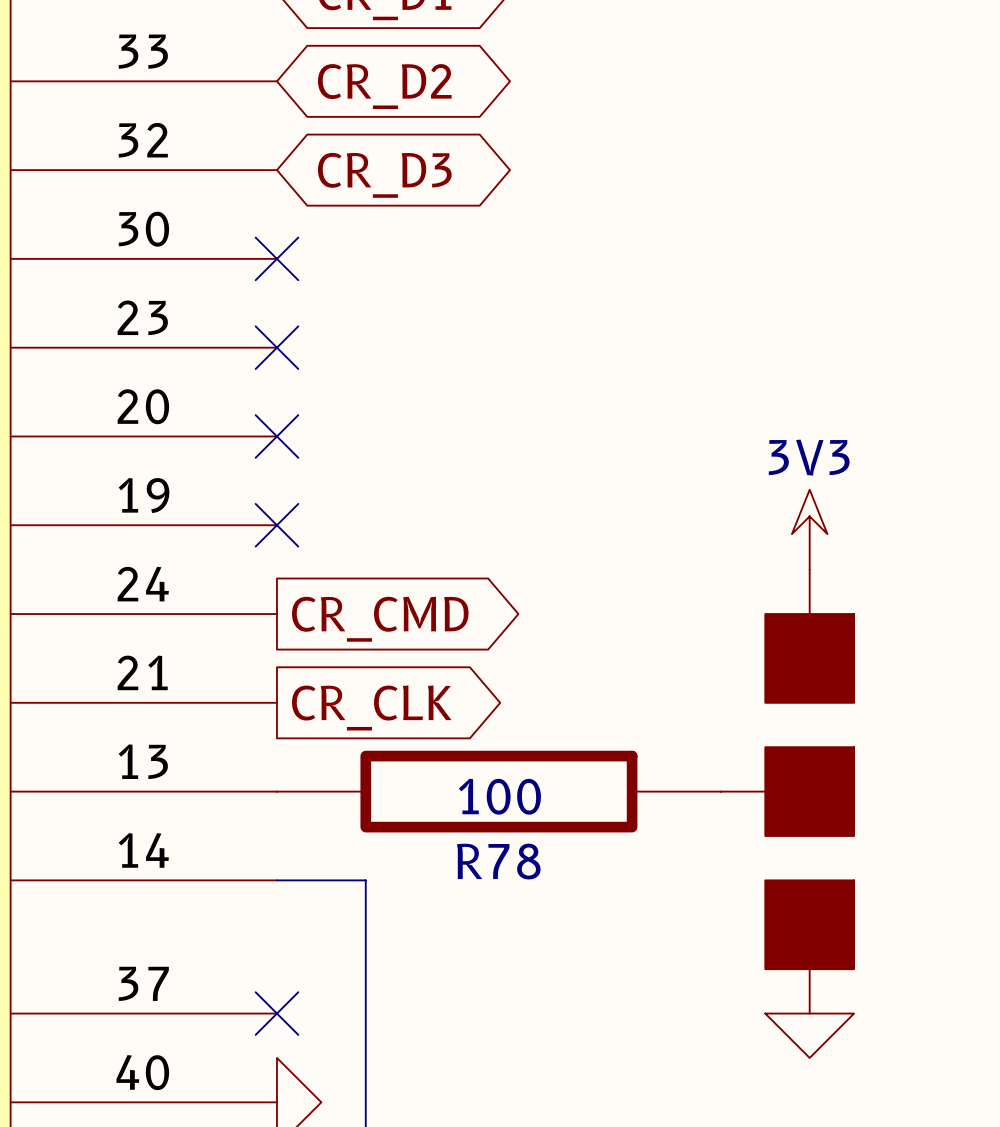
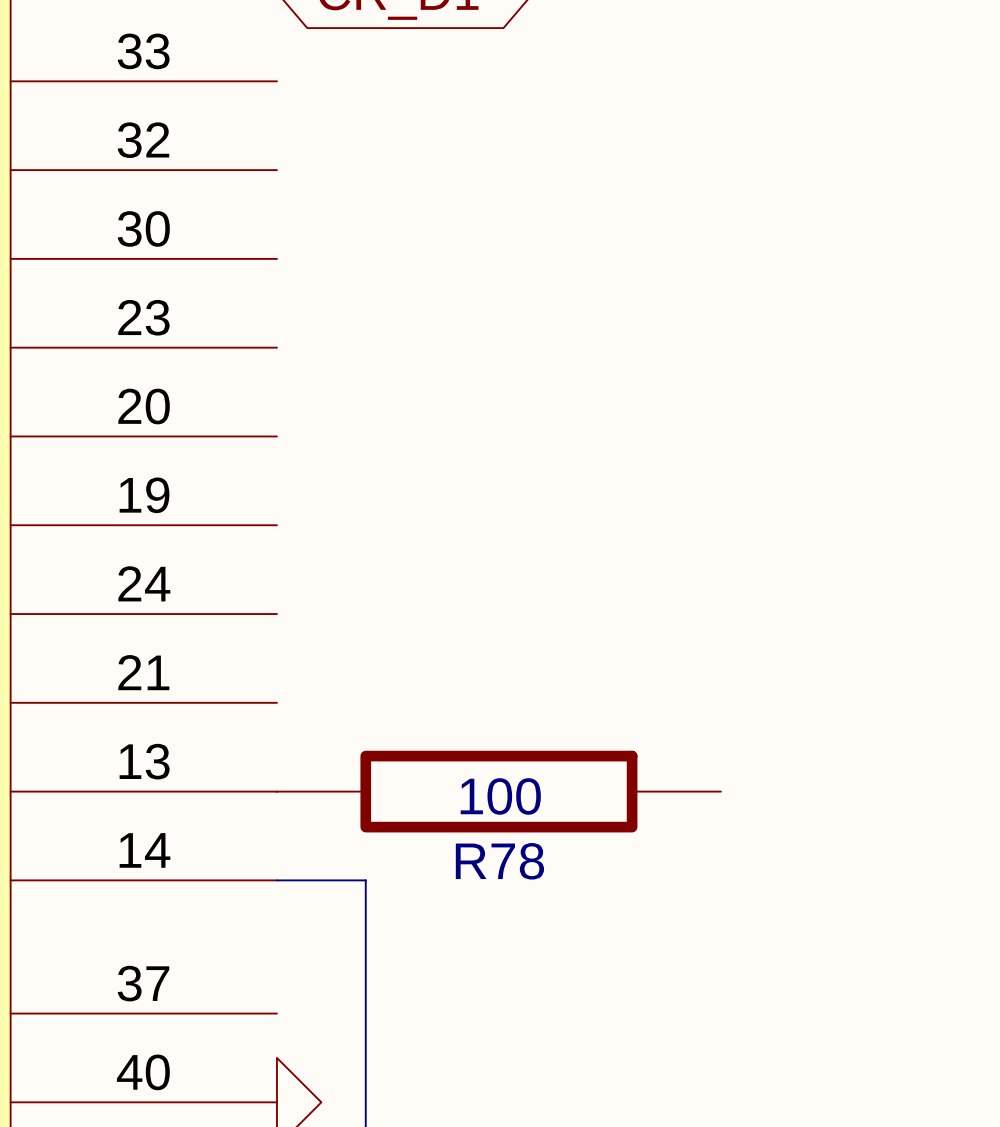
global label: CR_D2 (384, 86) -> none
global label: CR_D3 (384, 175) -> none
no-connect mark: (276, 258) -> none
no-connect mark: (276, 347) -> none
no-connect mark: (276, 436) -> none
no-connect mark: (276, 525) -> none
power symbol: 3V3 (809, 529) -> none
global label: CR_CMD (380, 619) -> none
global label: CR_CLK (371, 708) -> none
part: (787, 791) -> none
no-connect mark: (276, 1013) -> none
power symbol: (809, 1035) -> none

